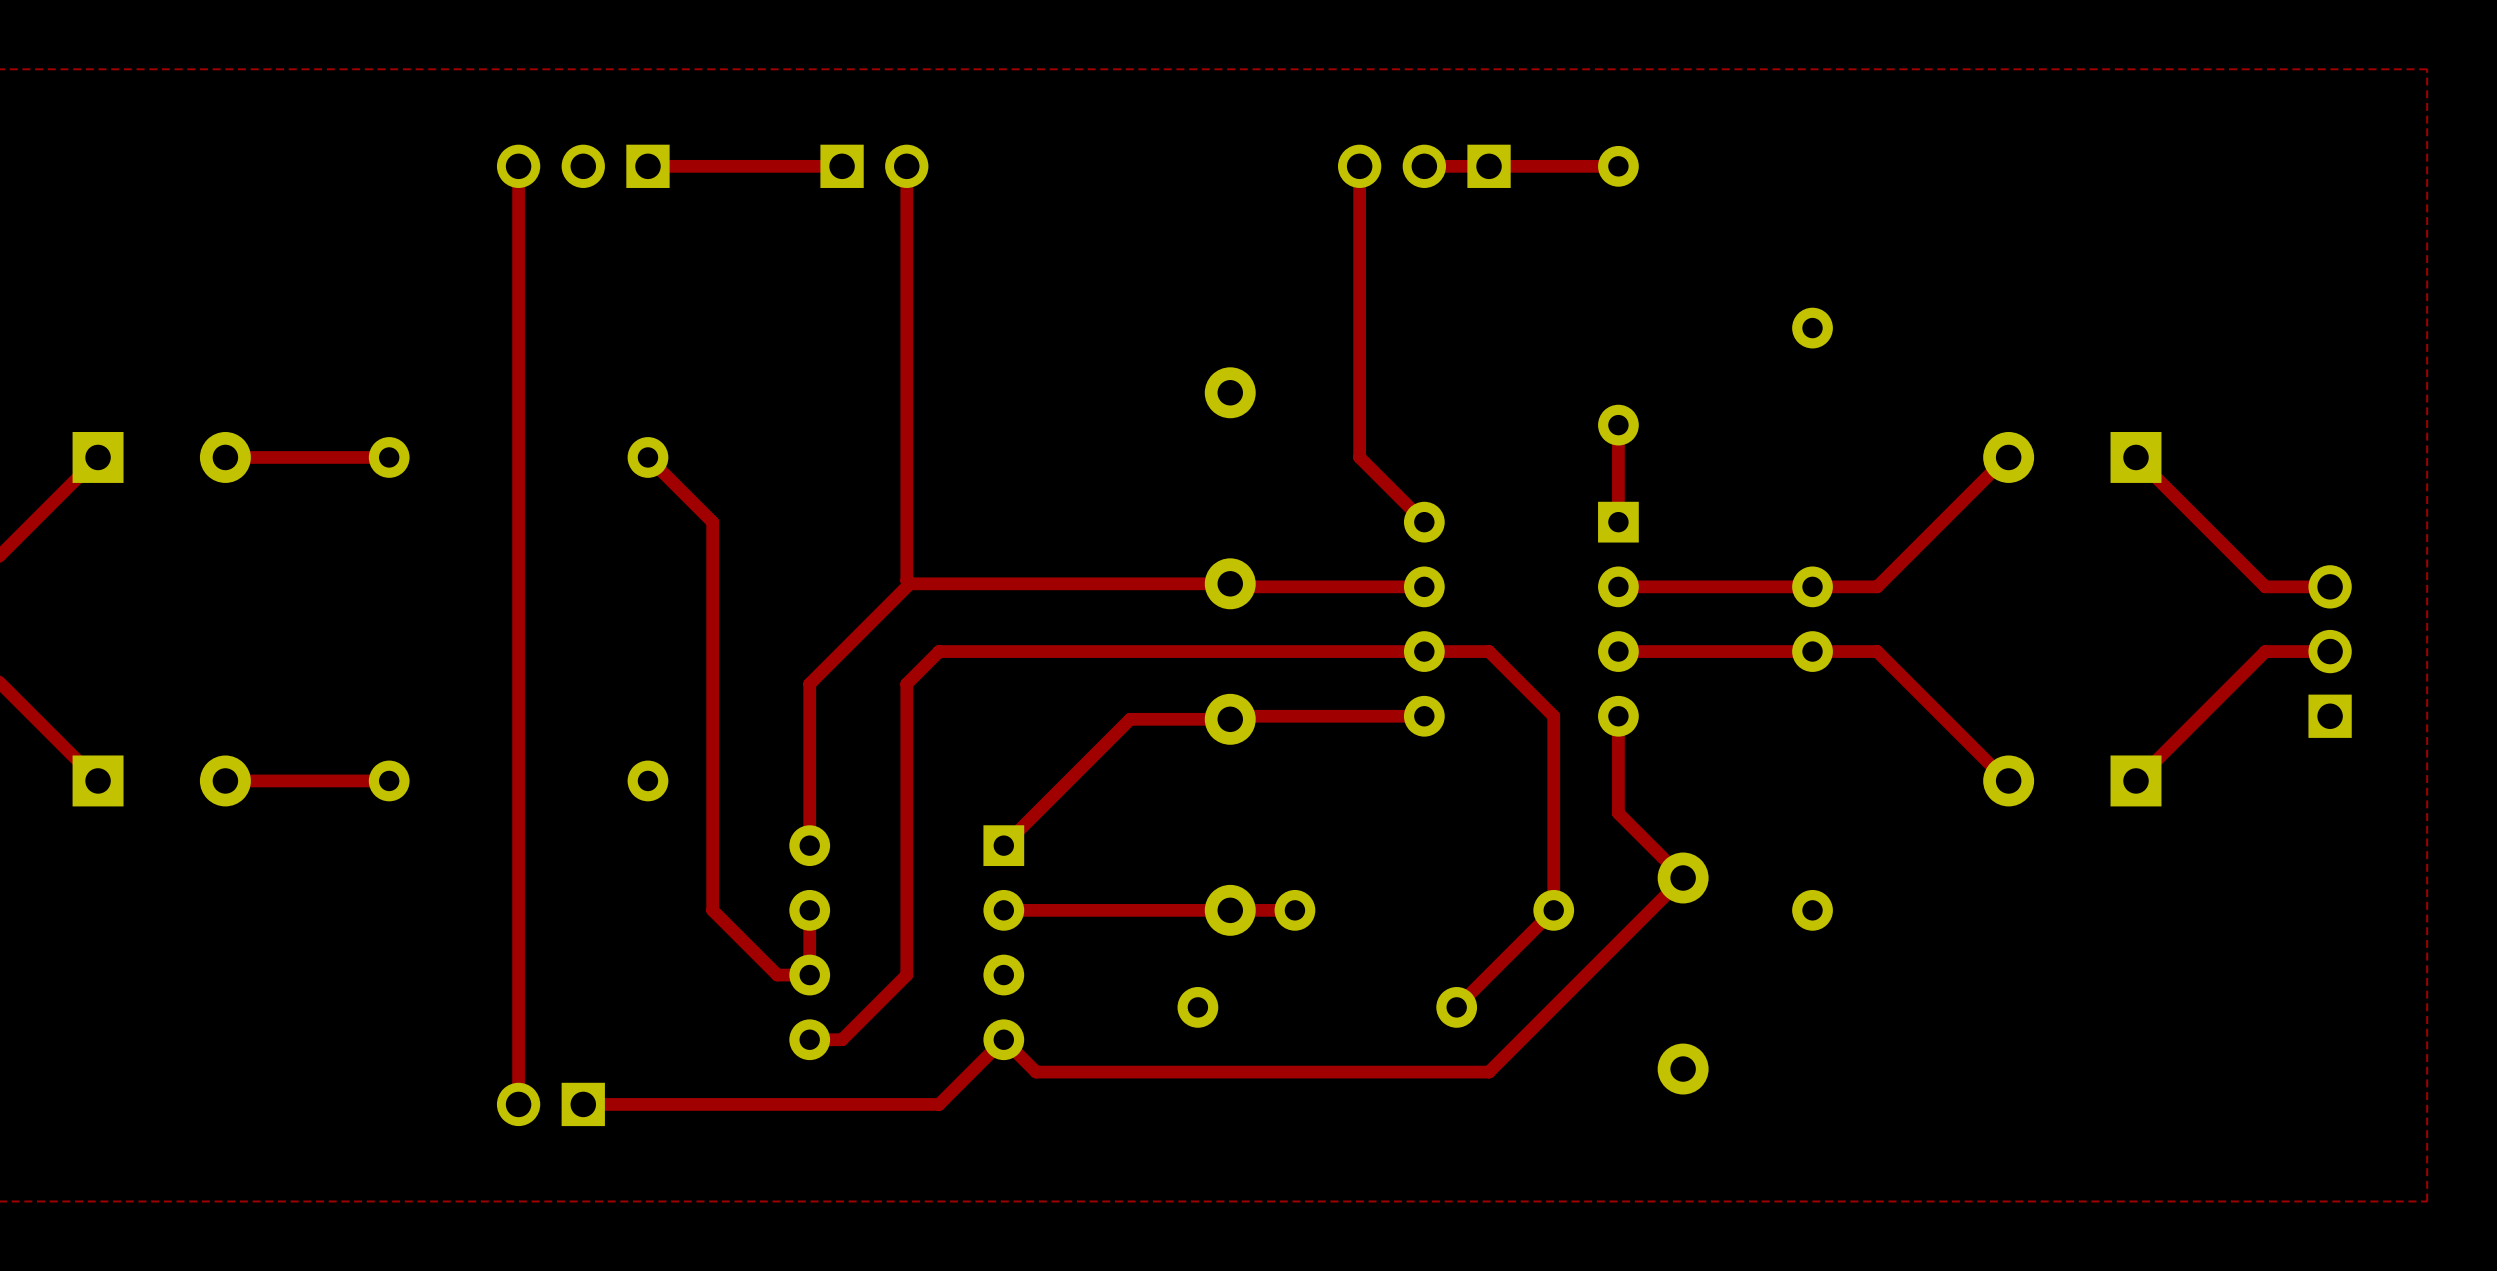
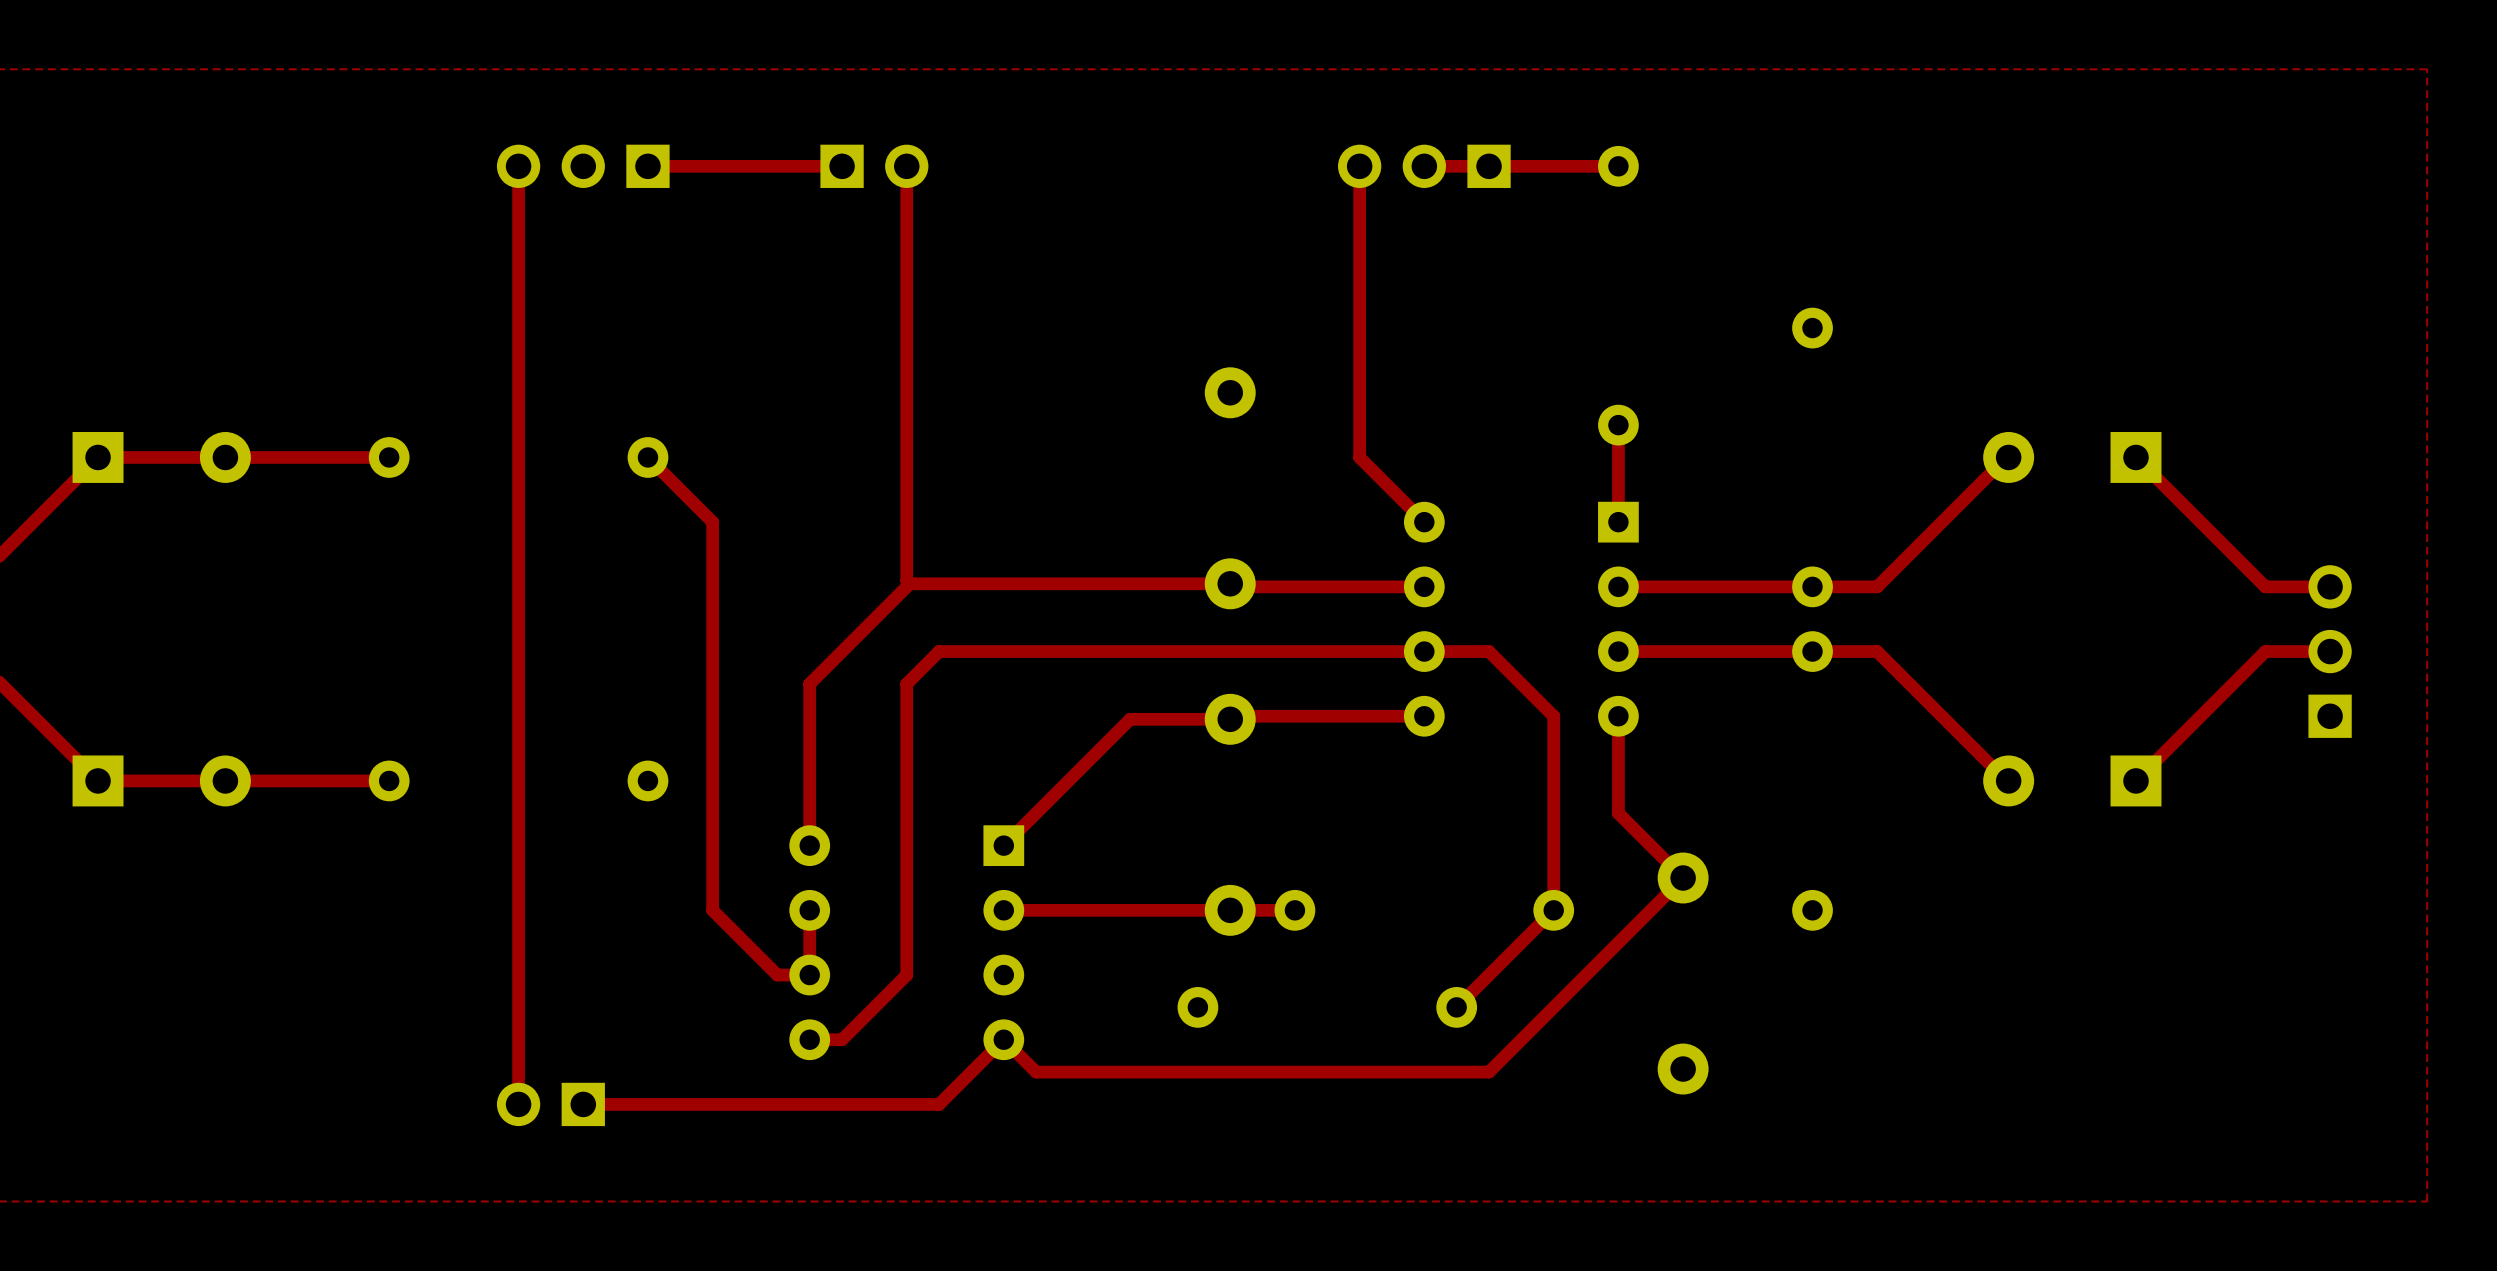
top track: none -> (225, 457) (100, 457)
top track: none -> (225, 780) (100, 780)

